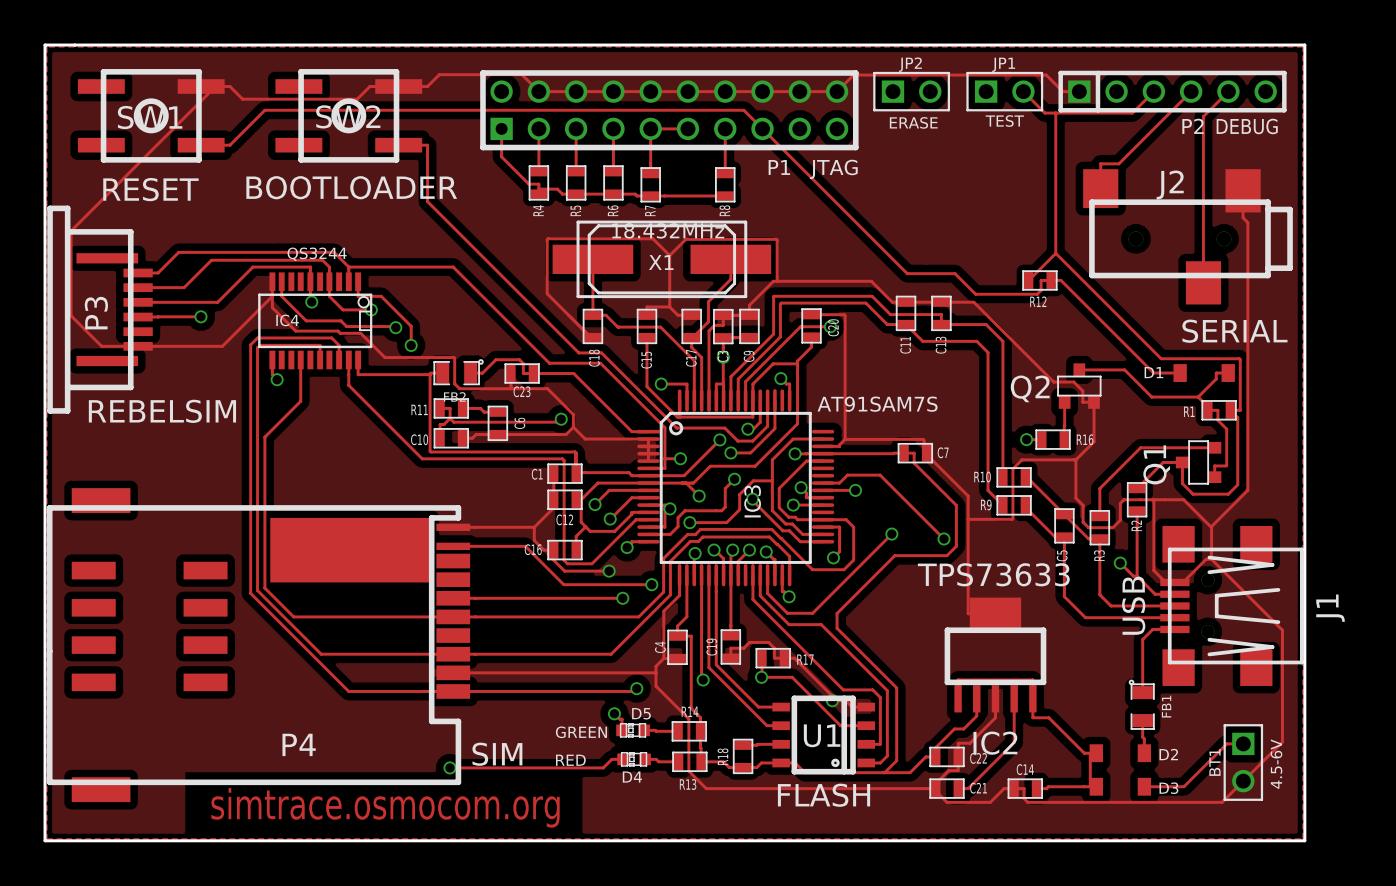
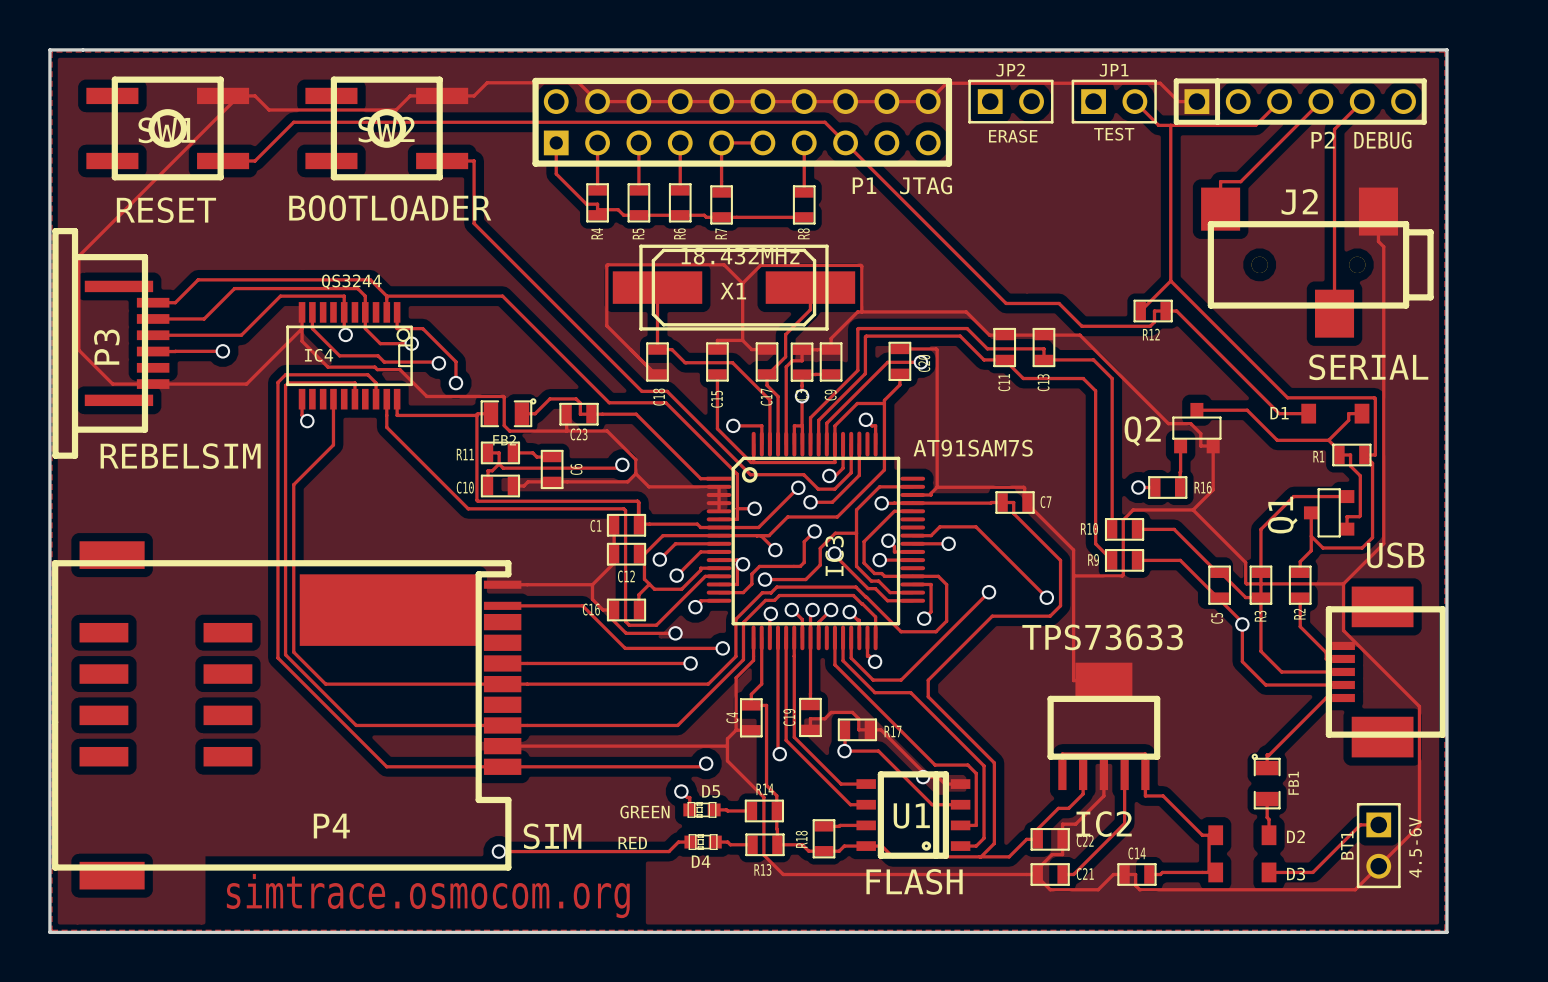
track: (1166, 447) (1140, 447) (1099, 488) (1099, 516) -> (1293, 496) (1260, 529) (1260, 566)
track: (1075, 459) (1075, 498) (1083, 505) (1083, 522) (1088, 527) (1112, 527) (1120, 520) (1120, 503) (1124, 499) (1183, 499) (1211, 527) -> (1193, 509) (1245, 562) (1246, 583) (1343, 583)
track: (1182, 462) (1163, 462) (1137, 488) -> none
track: (1027, 477) (1088, 538) (1099, 538) (1099, 594) (1111, 605) (1155, 605) -> (1139, 529) (1174, 529) (1215, 570) (1215, 575) (1224, 575) (1245, 597) (1260, 597)
track: none -> (1311, 536) (1311, 550) (1300, 561) (1300, 572)
R2 position: (1137, 499) -> (1300, 585)
track: (1153, 499) (1153, 570) (1165, 582) (1182, 582) (1206, 559) (1211, 559) (1282, 630) (1282, 742) (1280, 744) -> (1343, 620) (1343, 630) (1419, 706) (1419, 825)
track: (1025, 505) (1055, 537) (1064, 537) (1064, 596) (1085, 617) (1141, 617) -> (1136, 560) (1180, 560) (1242, 622) (1242, 661) (1265, 685)
C5: (1064, 525) -> none
R3: none -> (1260, 585)
track: none -> (1300, 597) (1300, 626) (1326, 652) (1326, 658) (1343, 658)
R3 name: R3 (1099, 555) -> C5 (1217, 618)
track: (1120, 563) (1155, 594) (1174, 594) -> none
track: none -> (1260, 638) (1260, 651) (1281, 671)
track: none -> (1302, 671) (1343, 671)
J1: USB (1231, 605) -> none
part: none -> USB (1385, 671)
track: none -> (1302, 685) (1343, 685)
track: (1174, 629) (1152, 629) (1142, 639) (1142, 680) -> (1343, 698) (1326, 698) (1267, 754)

